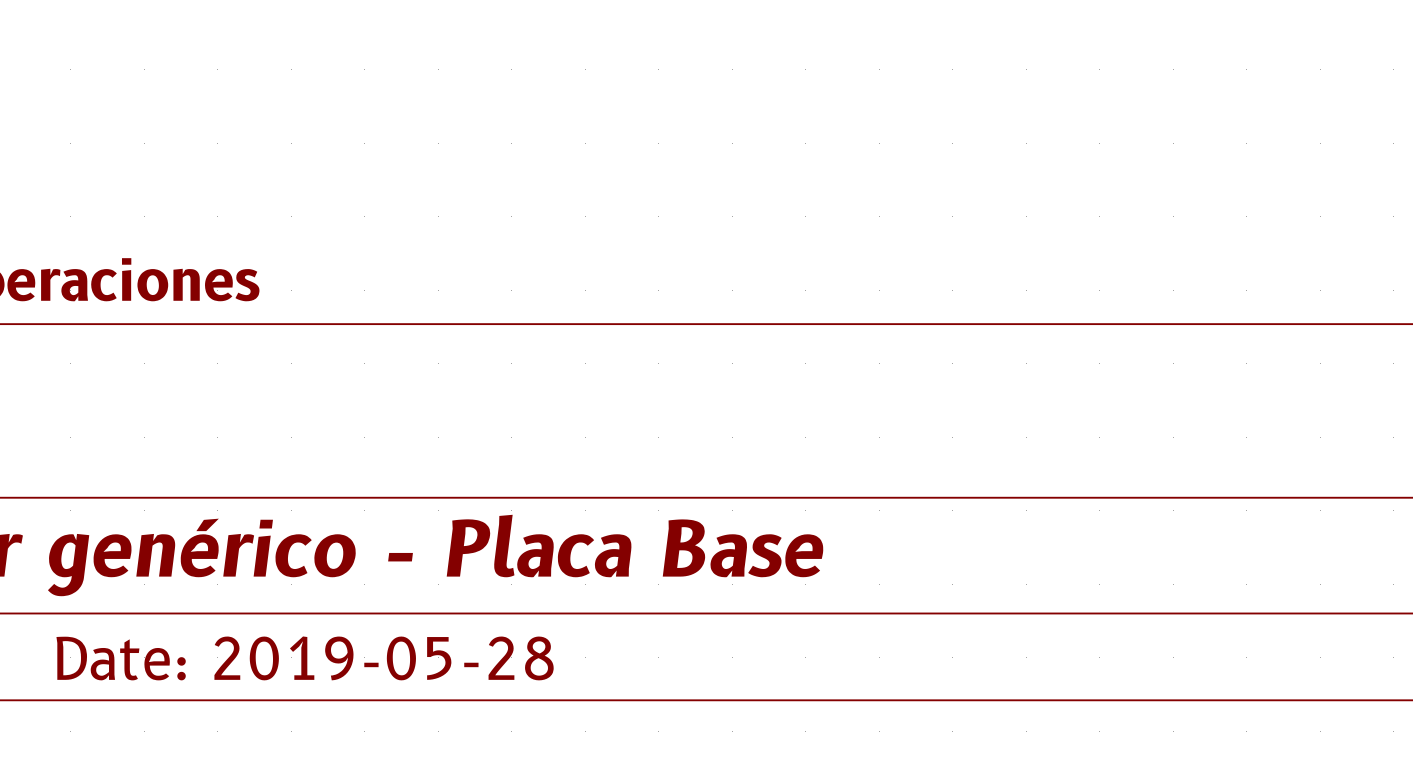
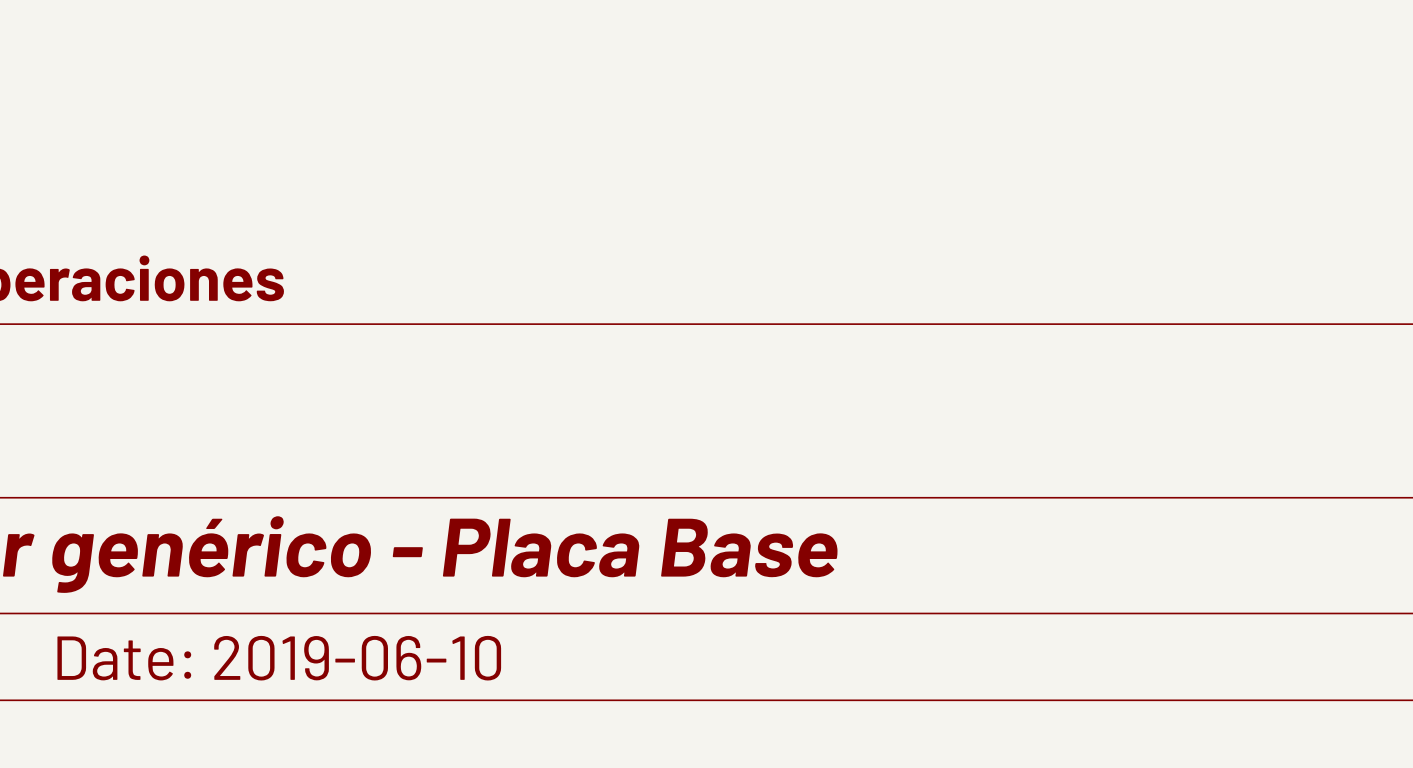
title block: Date: 2019-05-28 (305, 658) -> Date: 2019-06-10 (279, 658)

